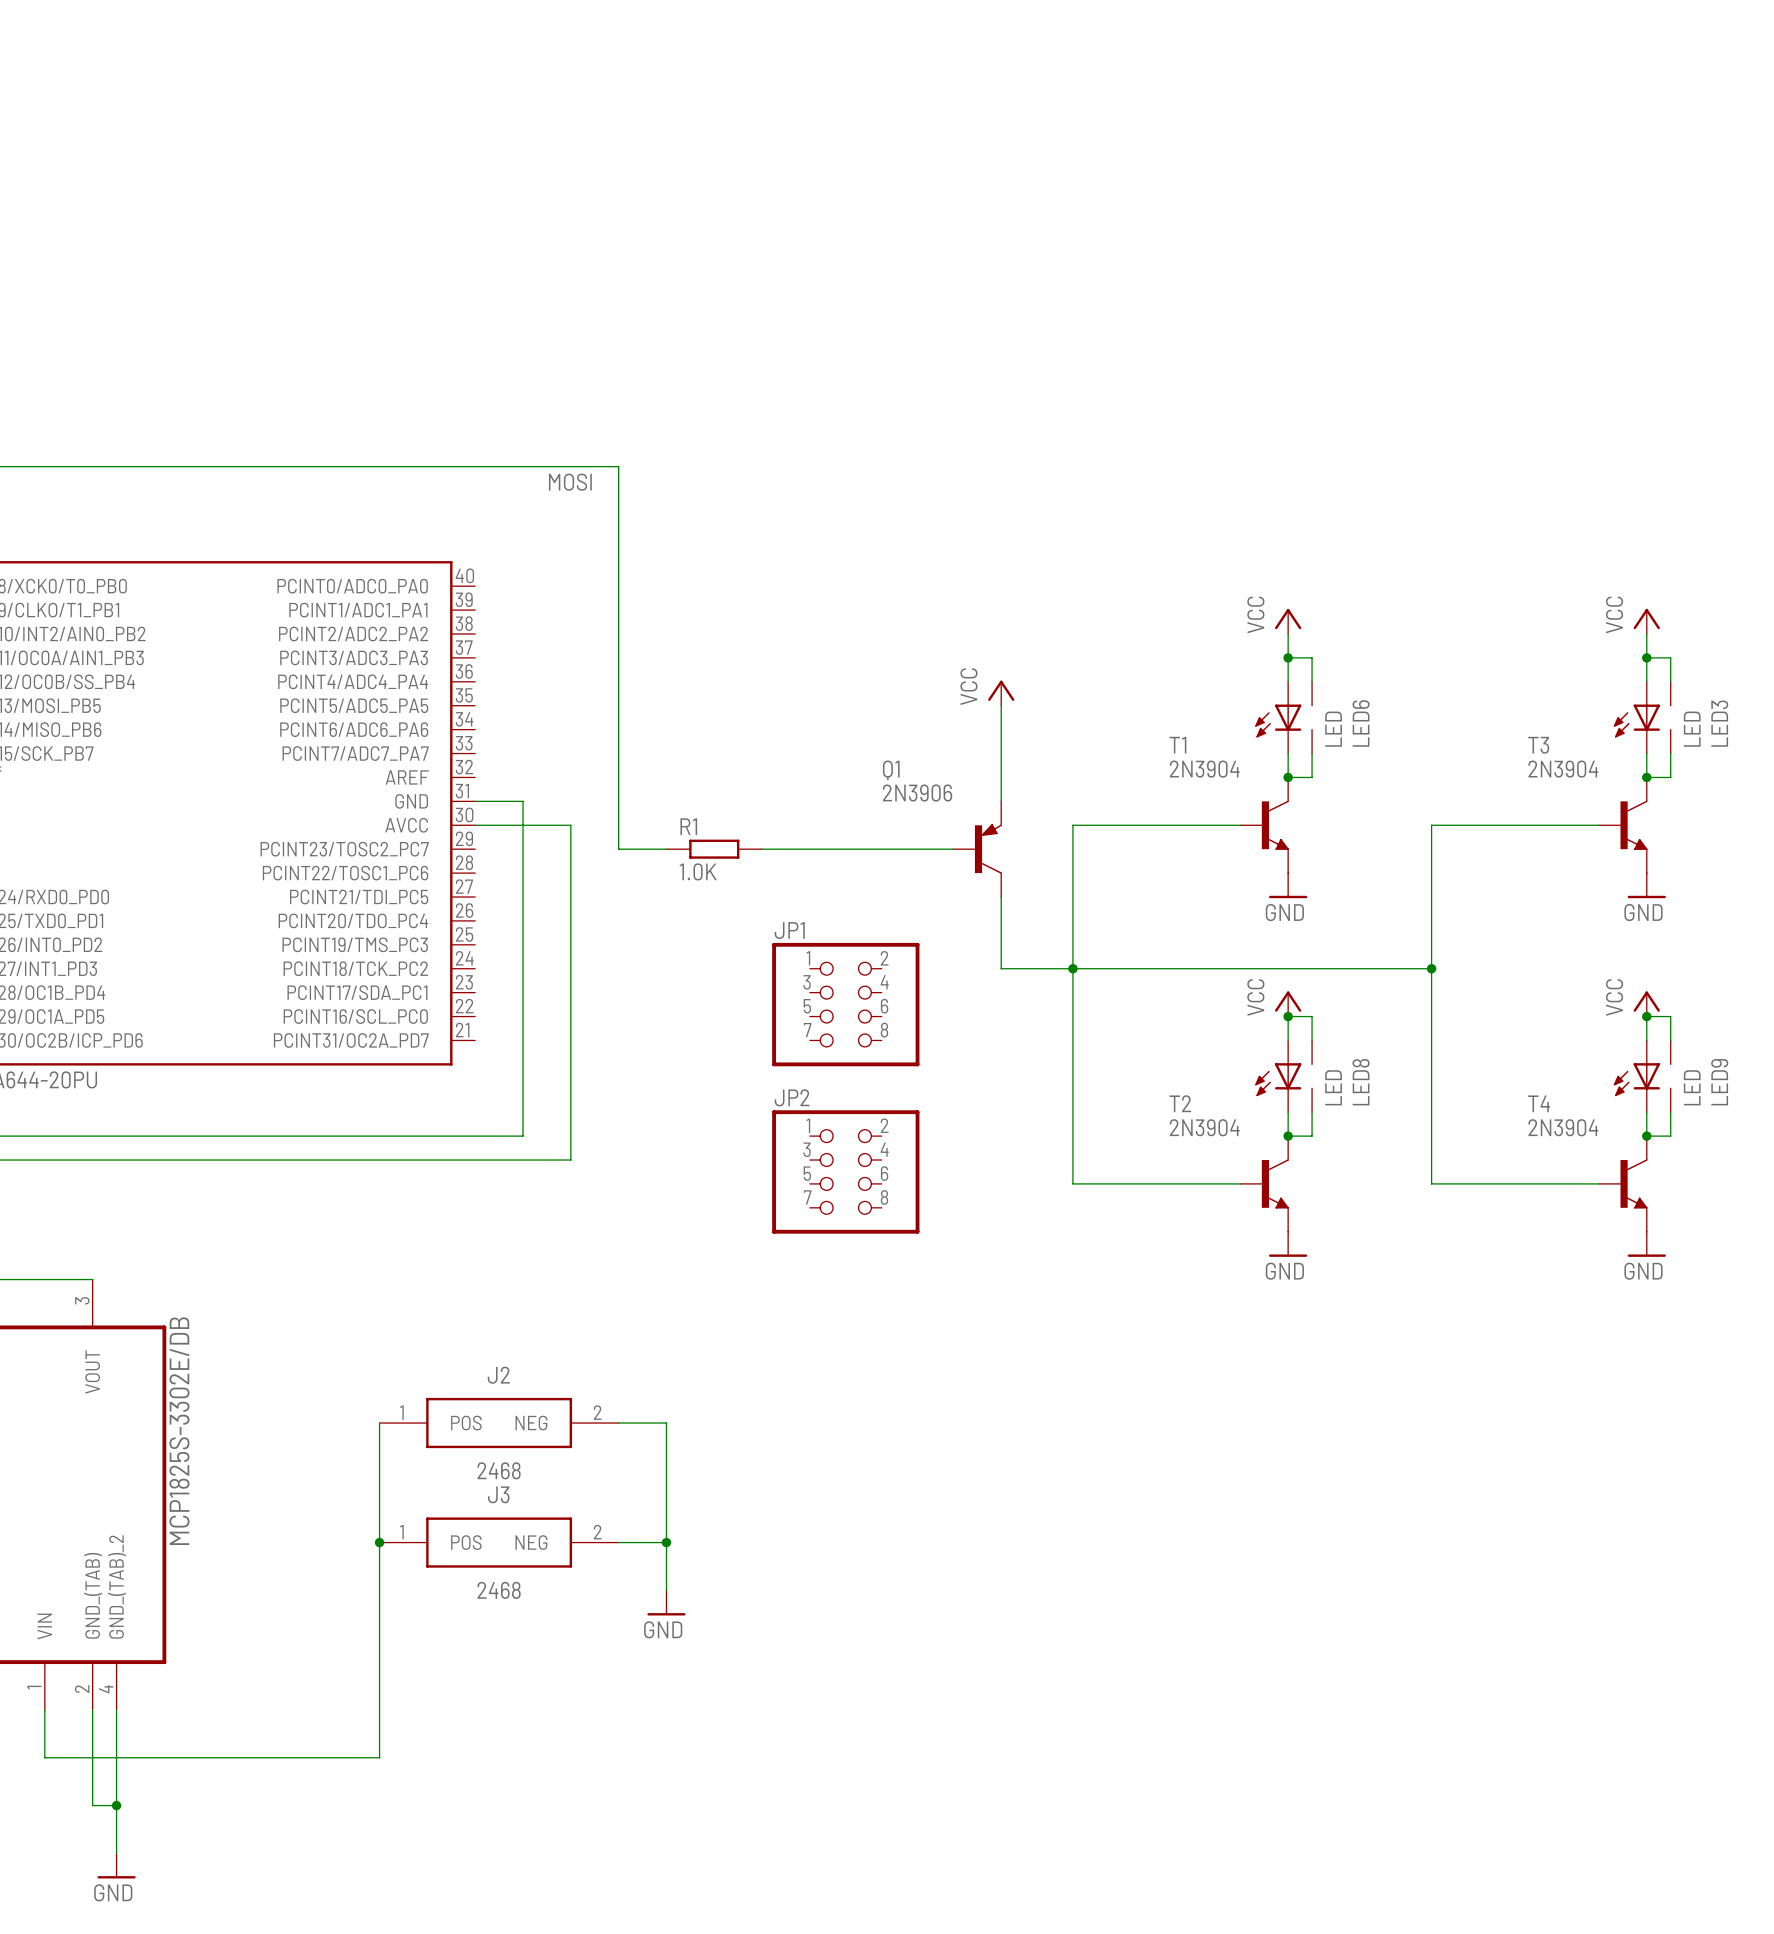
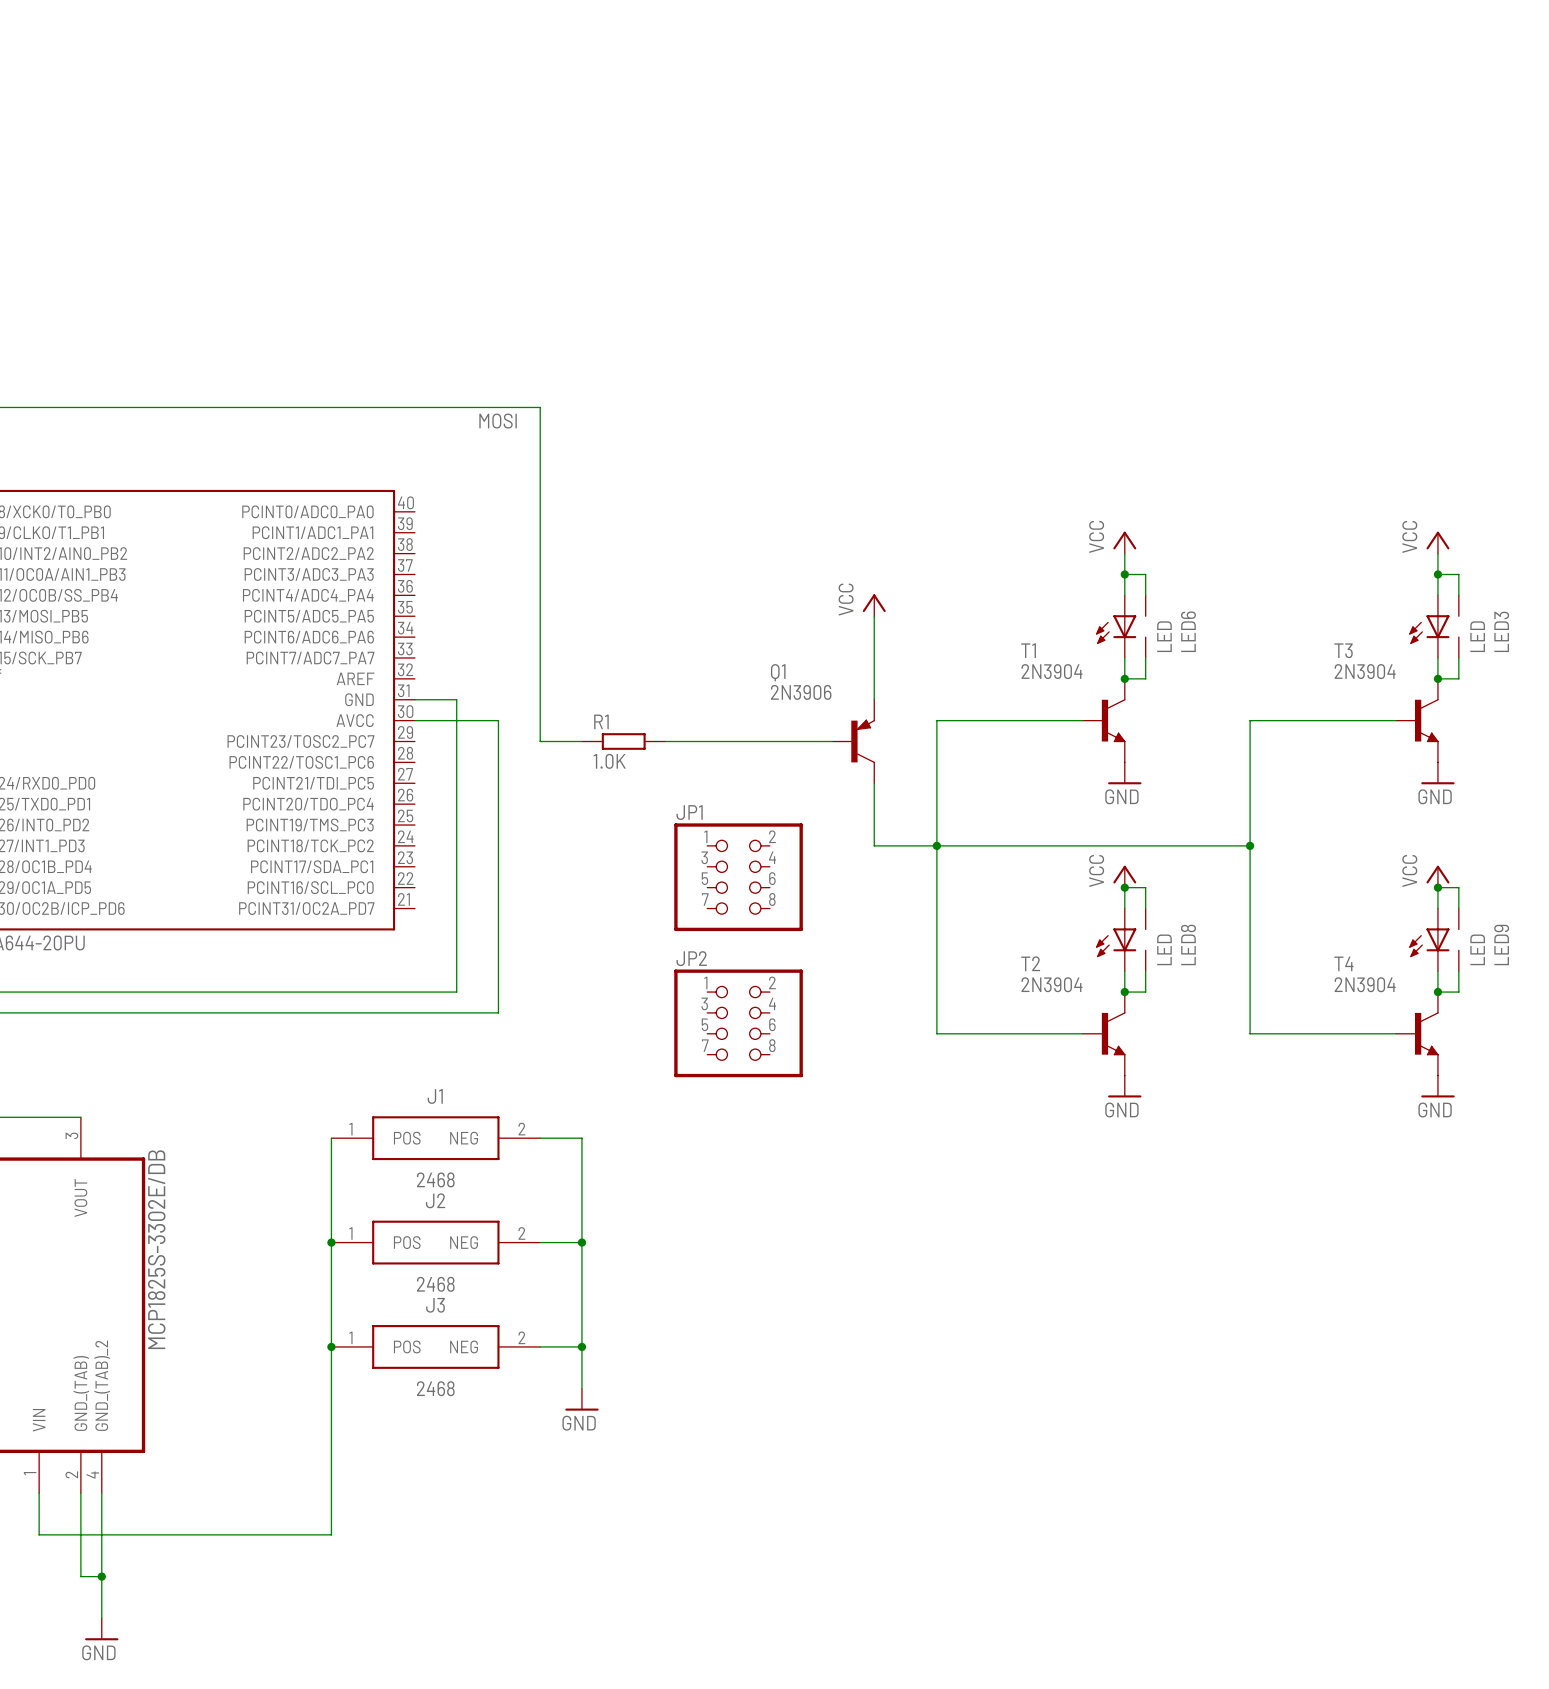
wire: none -> (331, 1138) (331, 1242)
J1: none -> 2468 (435, 1138)
wire: none -> (540, 1138) (581, 1138) (581, 1242)
junction: none -> (331, 1242)
junction: none -> (581, 1242)

